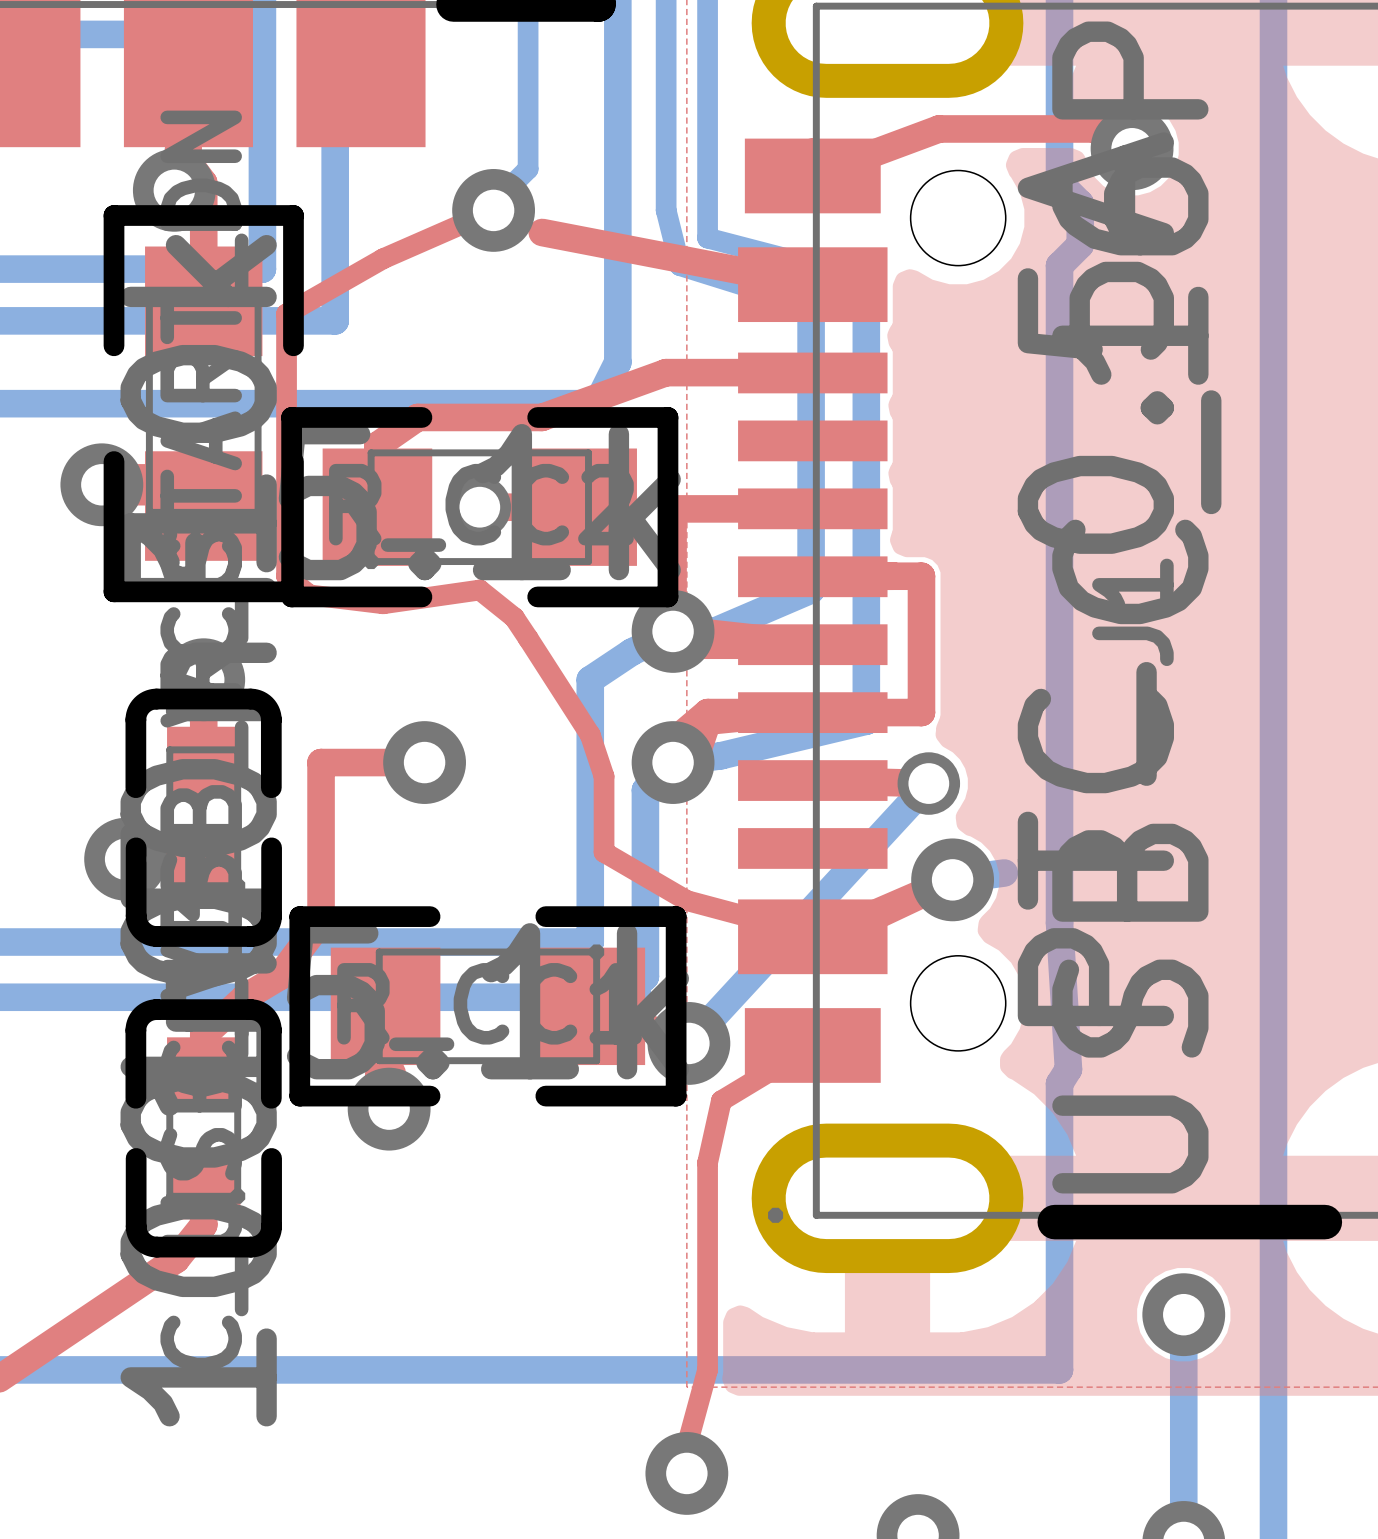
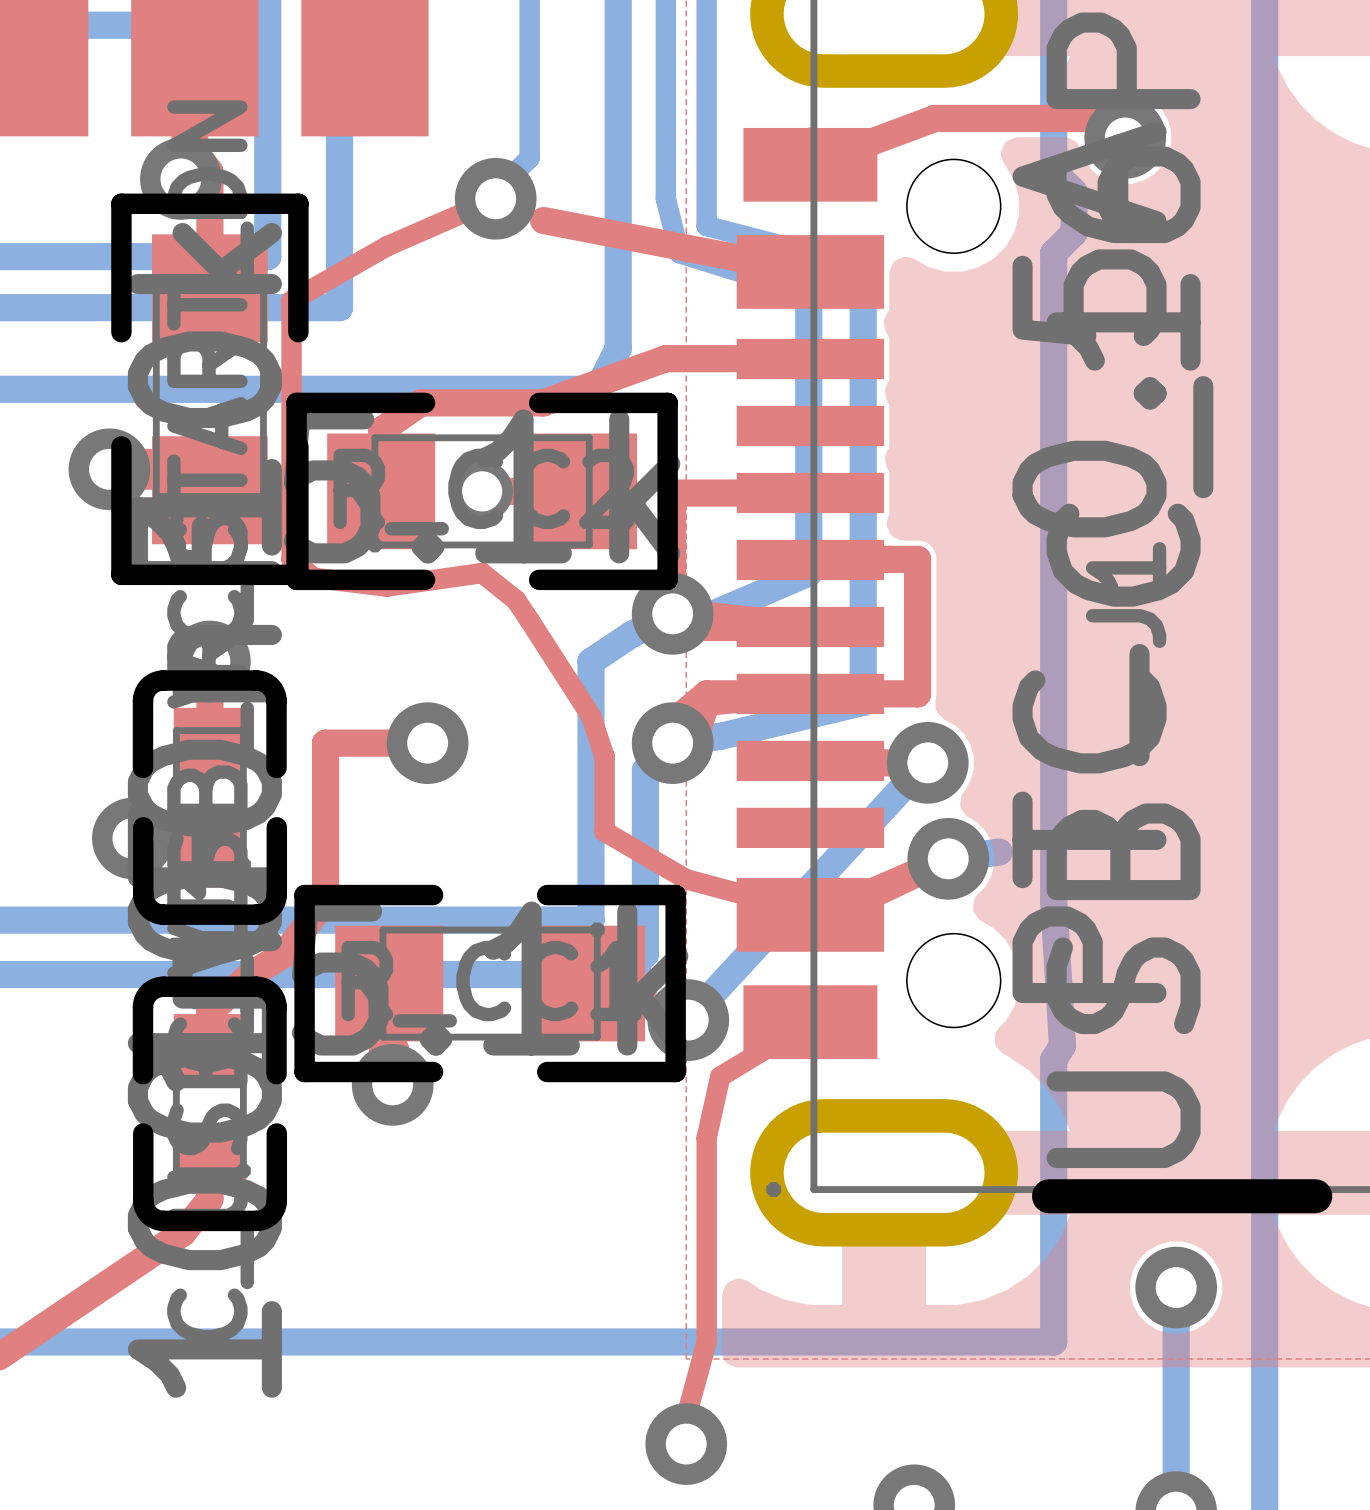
via size: [897, 752, 961, 815] -> [886, 722, 969, 804]

